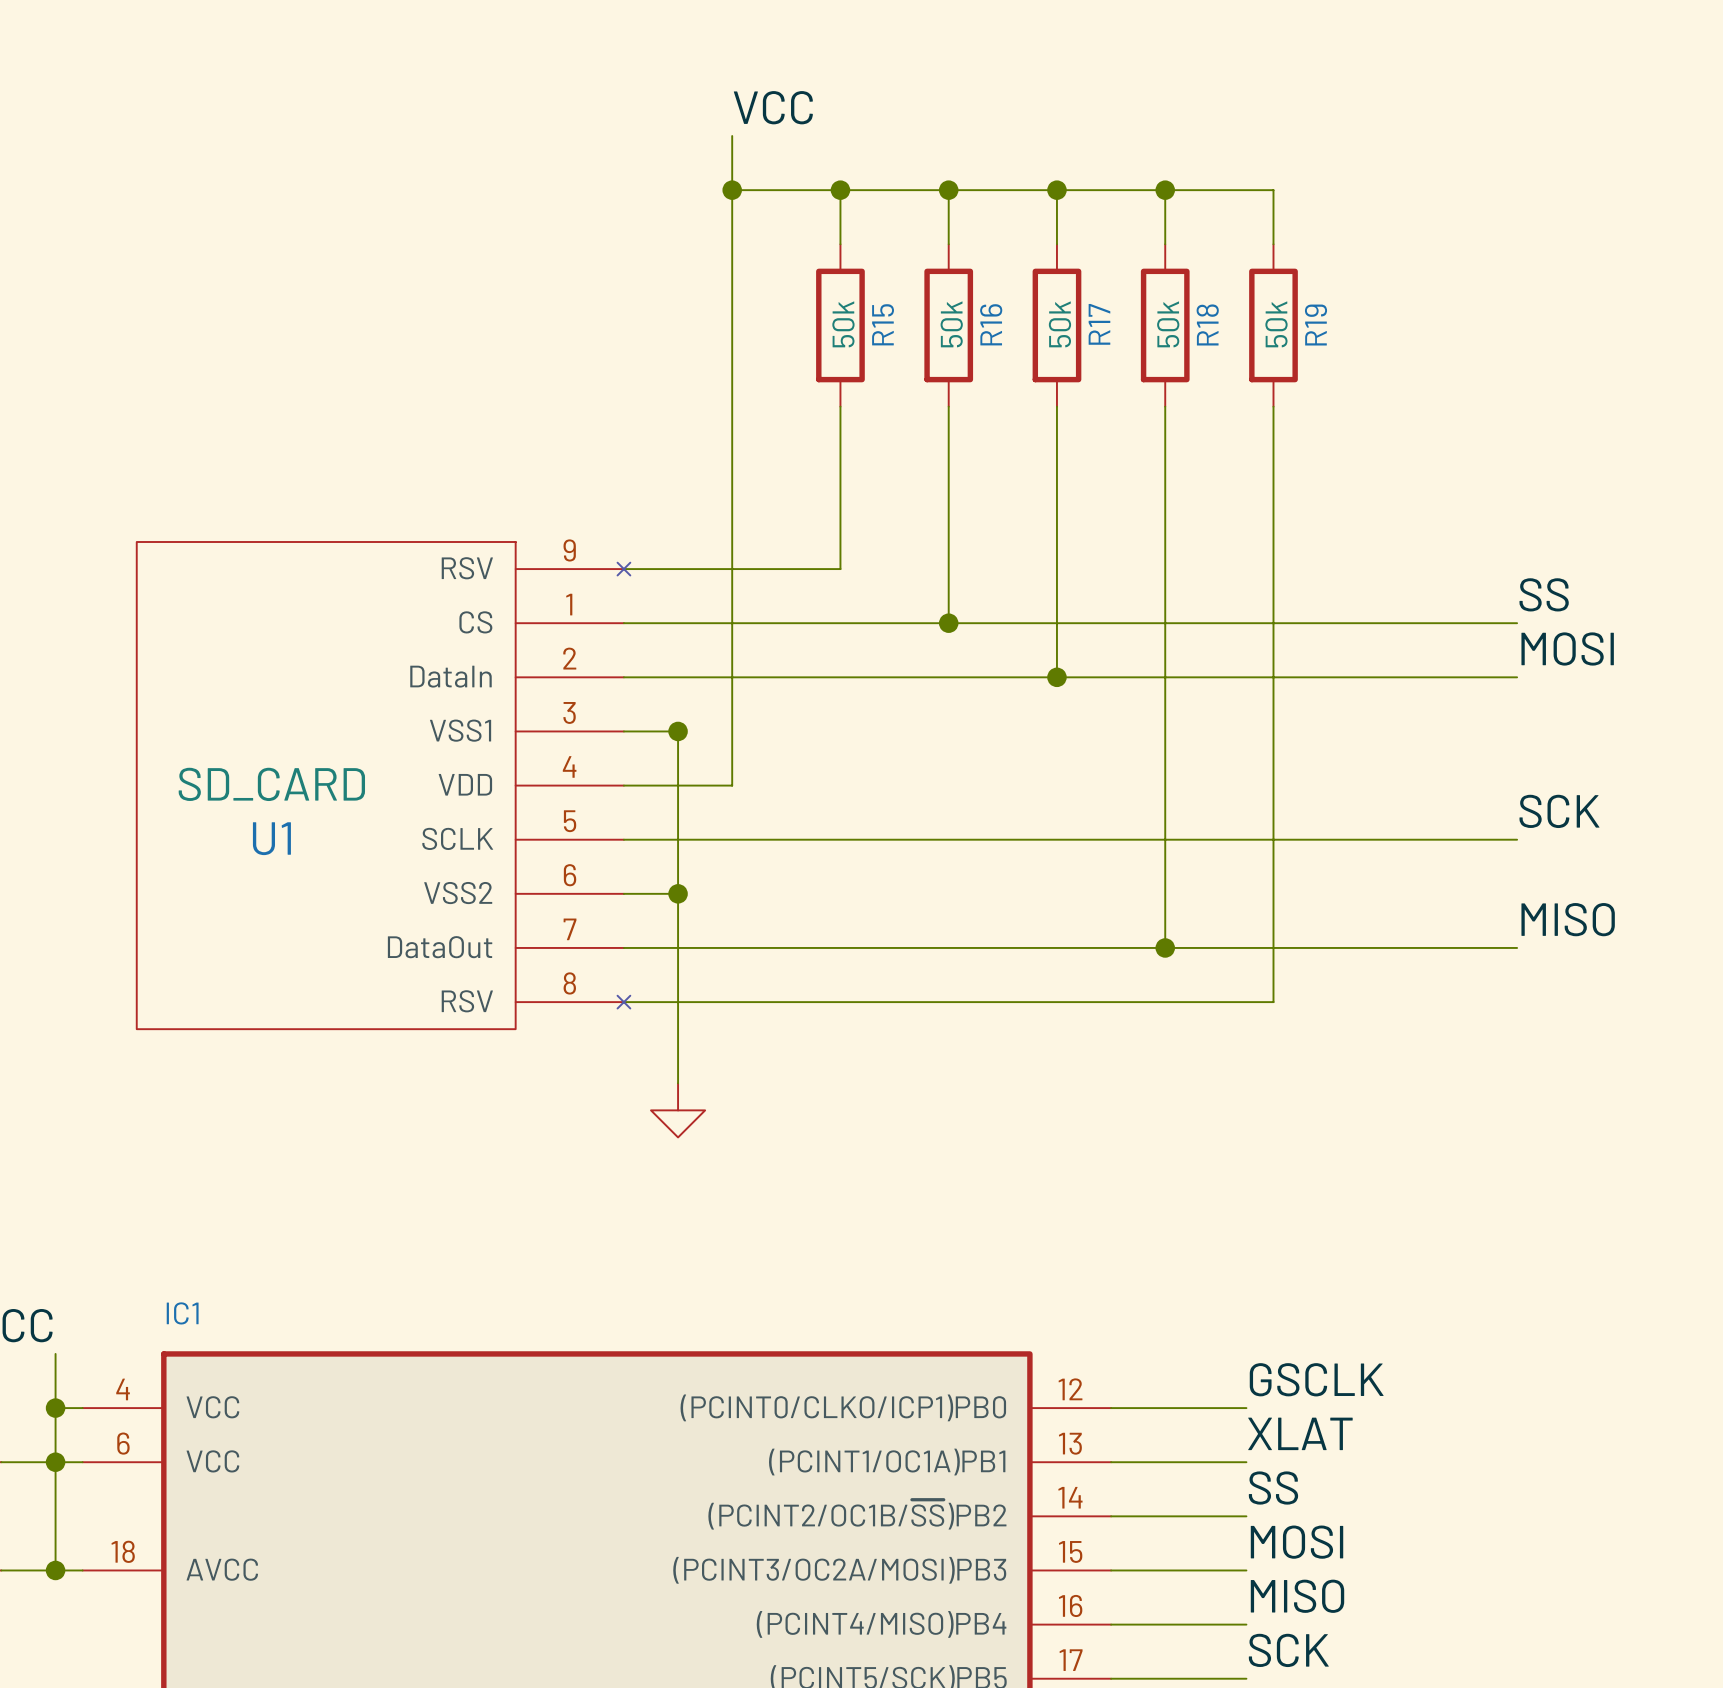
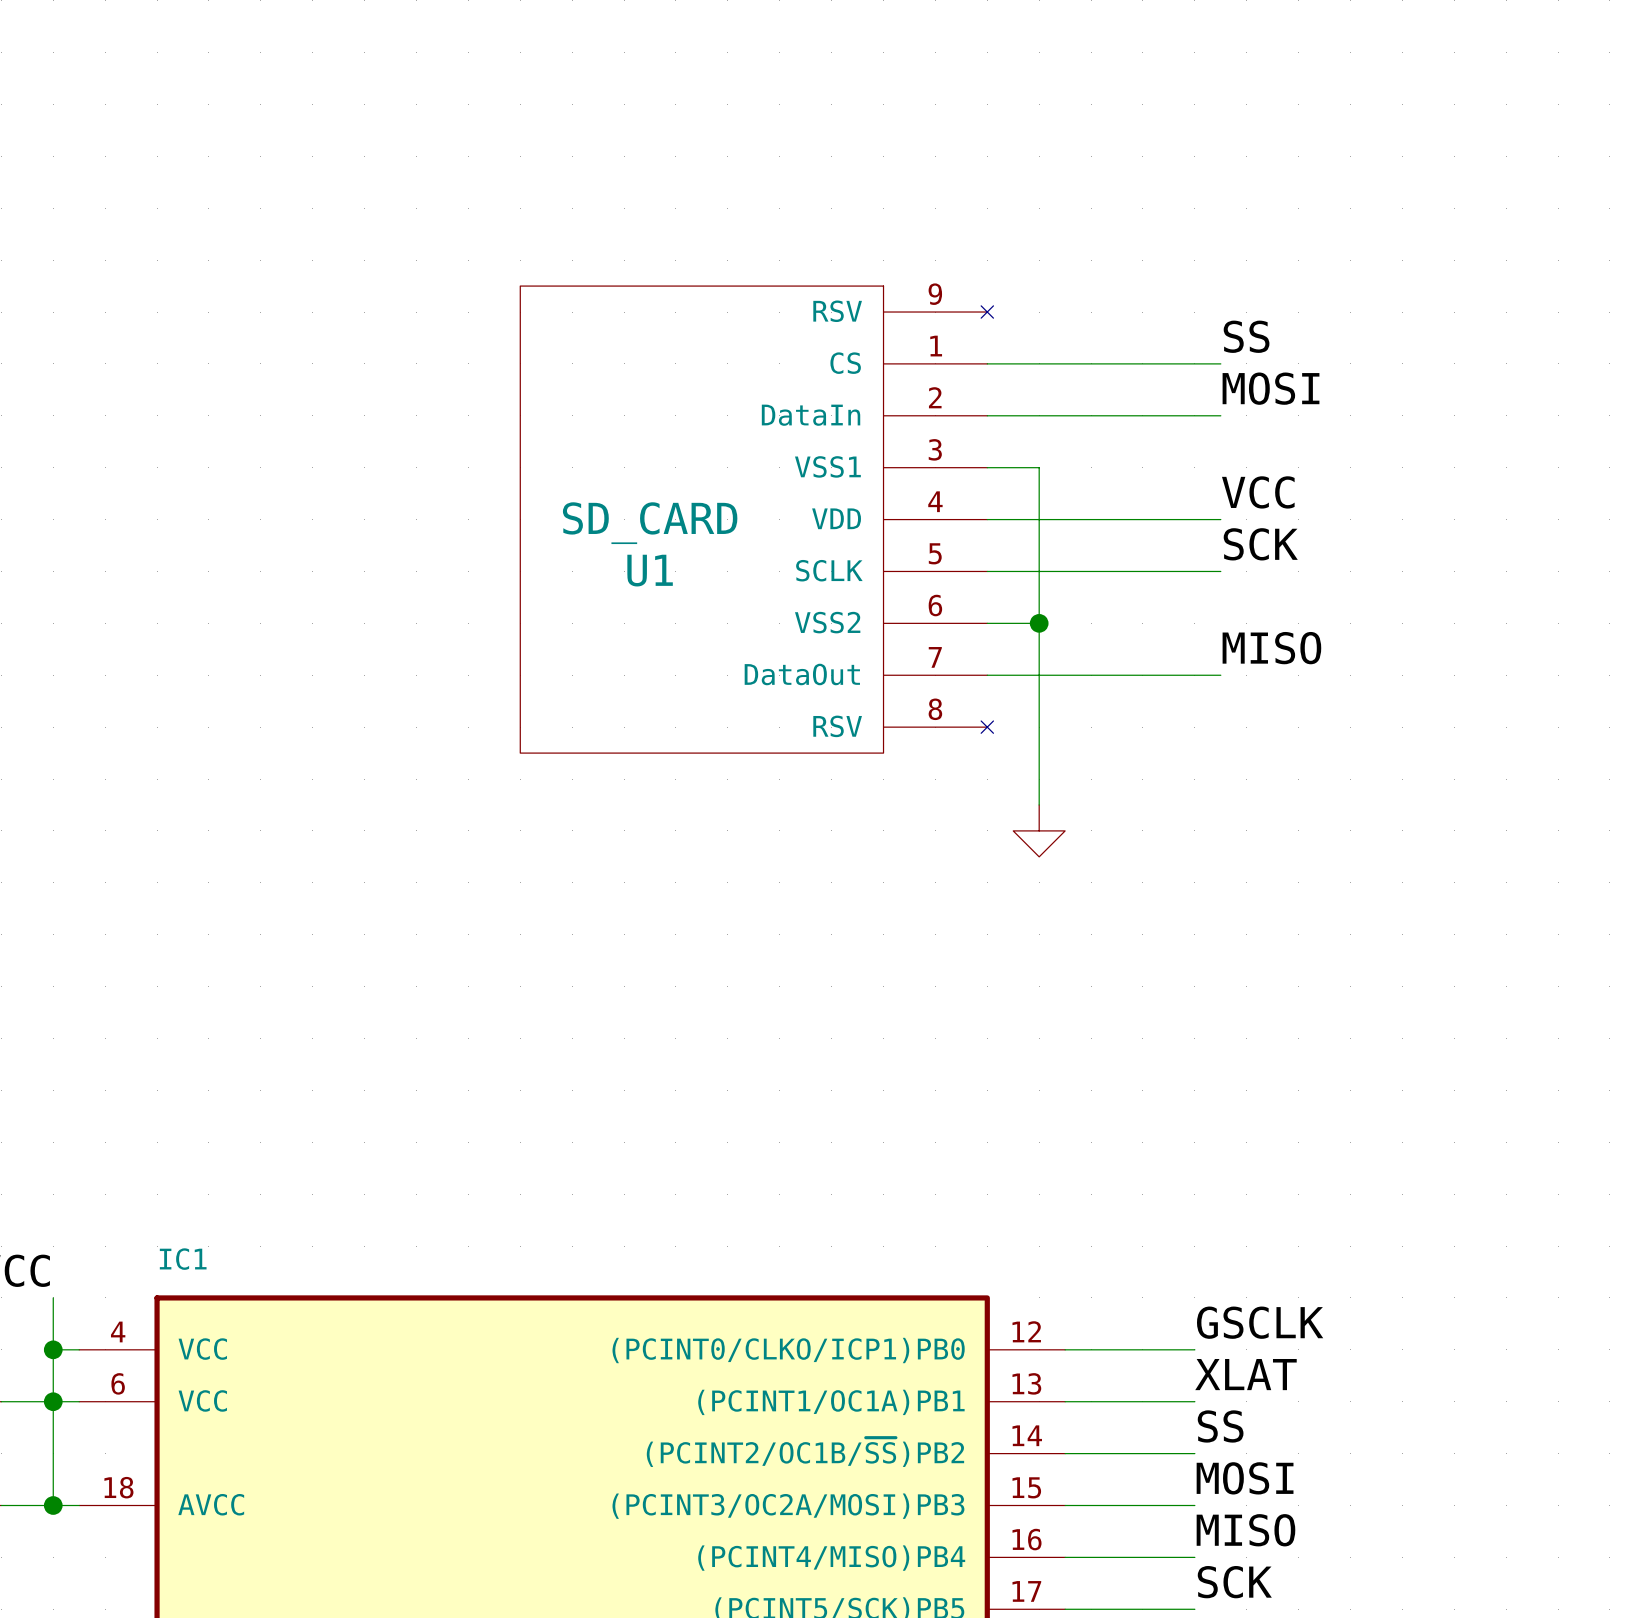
label: VCC (773, 107) -> none
wire: (732, 136) (732, 785) (623, 785) -> none
wire: (732, 190) (1273, 190) (1273, 244) -> none
junction: (732, 190) -> none
wire: (840, 190) (840, 244) -> none
junction: (840, 190) -> none
wire: (948, 190) (948, 244) -> none
junction: (948, 190) -> none
wire: (1056, 190) (1056, 244) -> none
junction: (1056, 190) -> none
wire: (1165, 190) (1165, 244) -> none
junction: (1165, 190) -> none
R15: 50k (840, 325) -> none
R16: 50k (948, 325) -> none
R17: 50k (1056, 325) -> none
R18: 50k (1165, 325) -> none
R19: 50k (1273, 325) -> none
wire: none -> (987, 363) (1220, 363)
wire: (840, 406) (840, 569) (623, 569) -> none
wire: (948, 406) (948, 623) -> none
wire: (1056, 406) (1056, 677) -> none
wire: (1165, 406) (1165, 947) -> none
wire: (1273, 406) (1273, 1002) (623, 1002) -> none
wire: none -> (987, 415) (1220, 415)
label: none -> VCC (1258, 492)
wire: none -> (987, 519) (1220, 519)
label position: SS (1544, 594) -> SS (1246, 336)
wire: none -> (987, 571) (1220, 571)
wire: (623, 623) (1517, 623) -> none
junction: (948, 623) -> none
label position: MOSI (1567, 648) -> MOSI (1271, 388)
wire: (623, 677) (1517, 677) -> none
junction position: (1056, 677) -> (1039, 623)
wire: none -> (987, 675) (1220, 675)
wire: (623, 731) (678, 731) (678, 1083) -> (987, 467) (1039, 467) (1039, 804)
junction: (678, 731) -> none
U1 position: (383, 785) -> (756, 519)
label position: SCK (1559, 811) -> SCK (1260, 544)
wire: (623, 839) (1517, 839) -> none
wire: (623, 893) (678, 893) -> (987, 623) (1039, 623)
junction: (678, 893) -> none
label position: MISO (1568, 919) -> MISO (1271, 648)
wire: (623, 947) (1517, 947) -> none
junction: (1165, 947) -> none
power symbol position: (678, 1110) -> (1039, 830)

